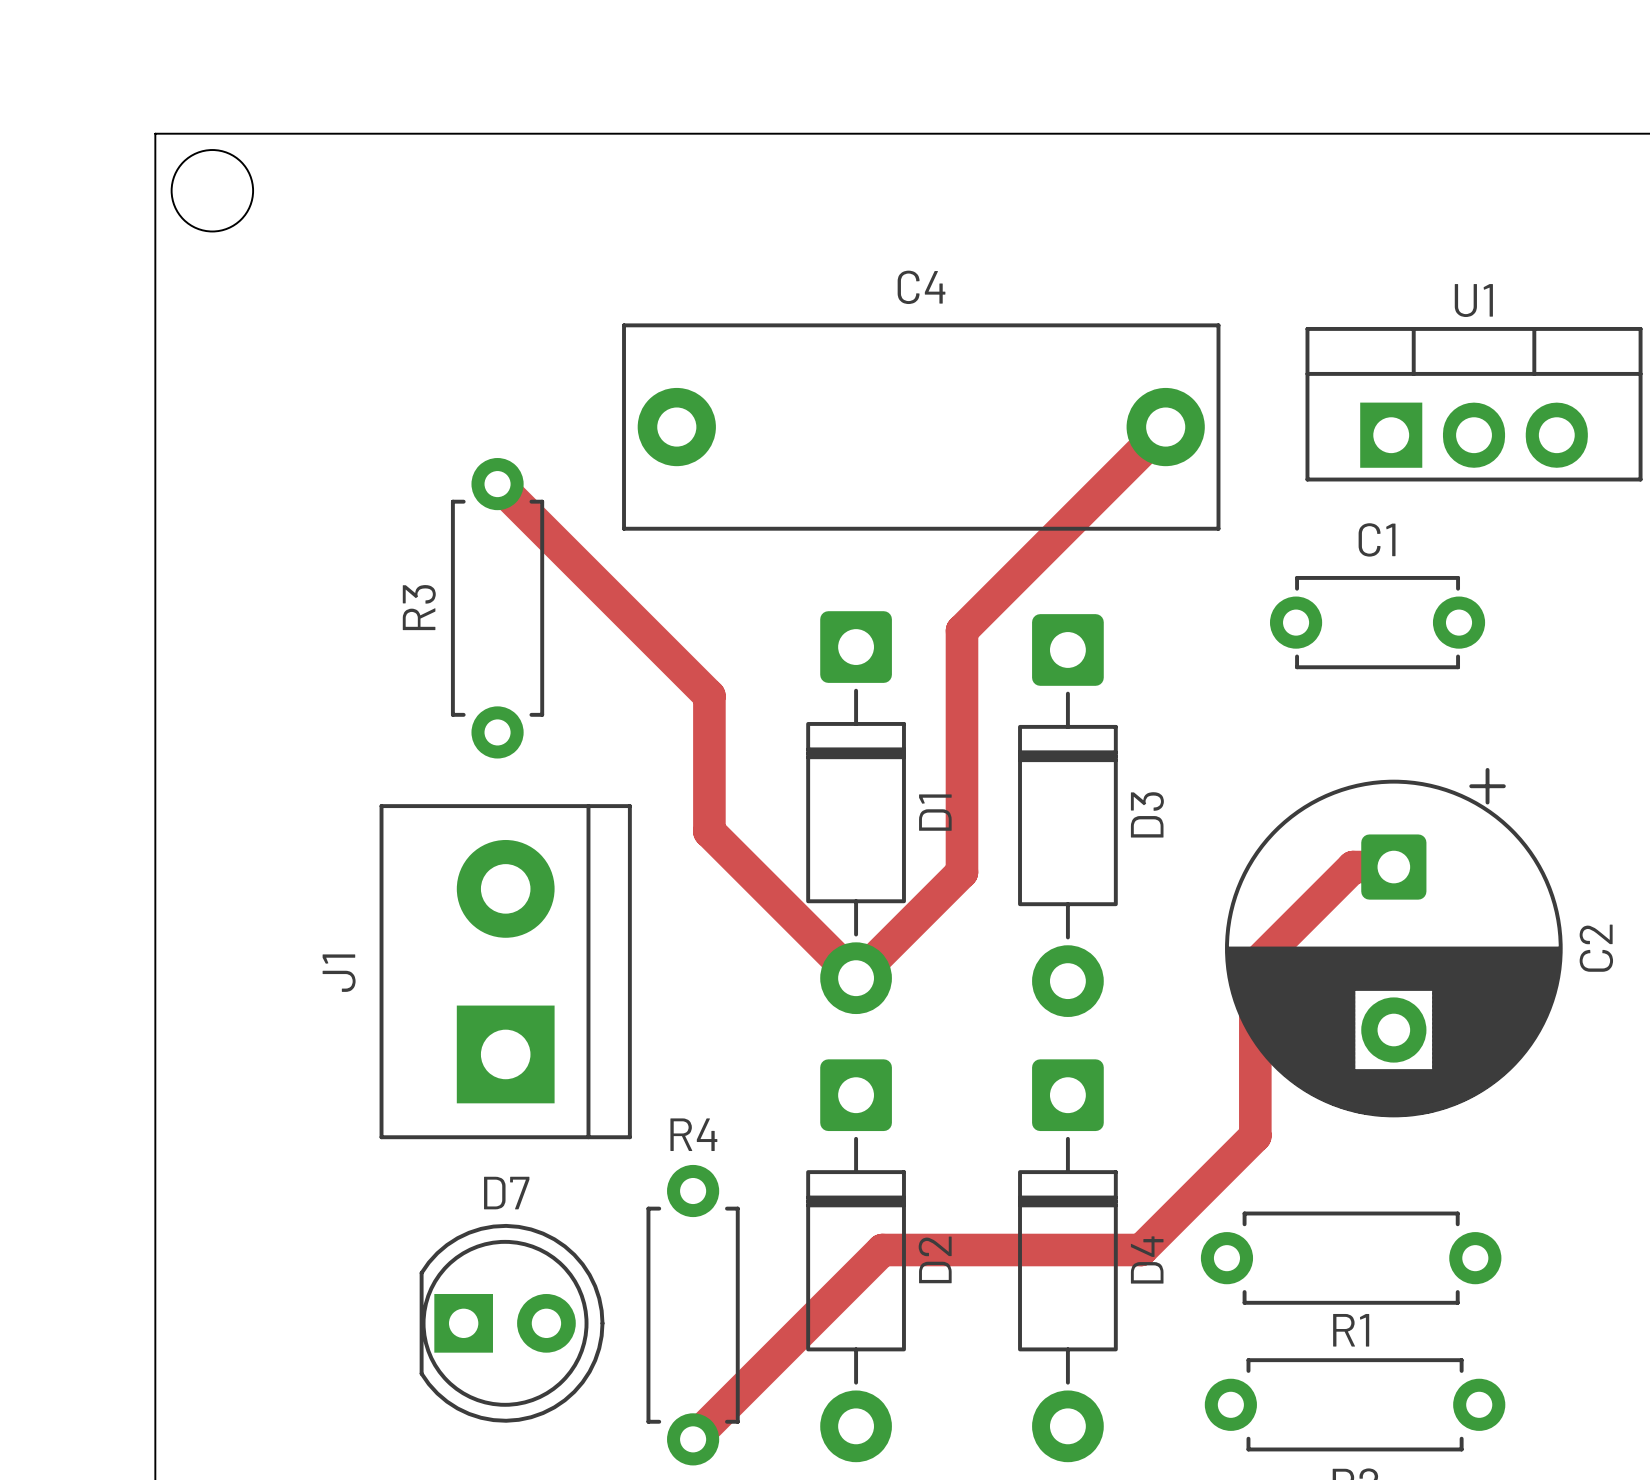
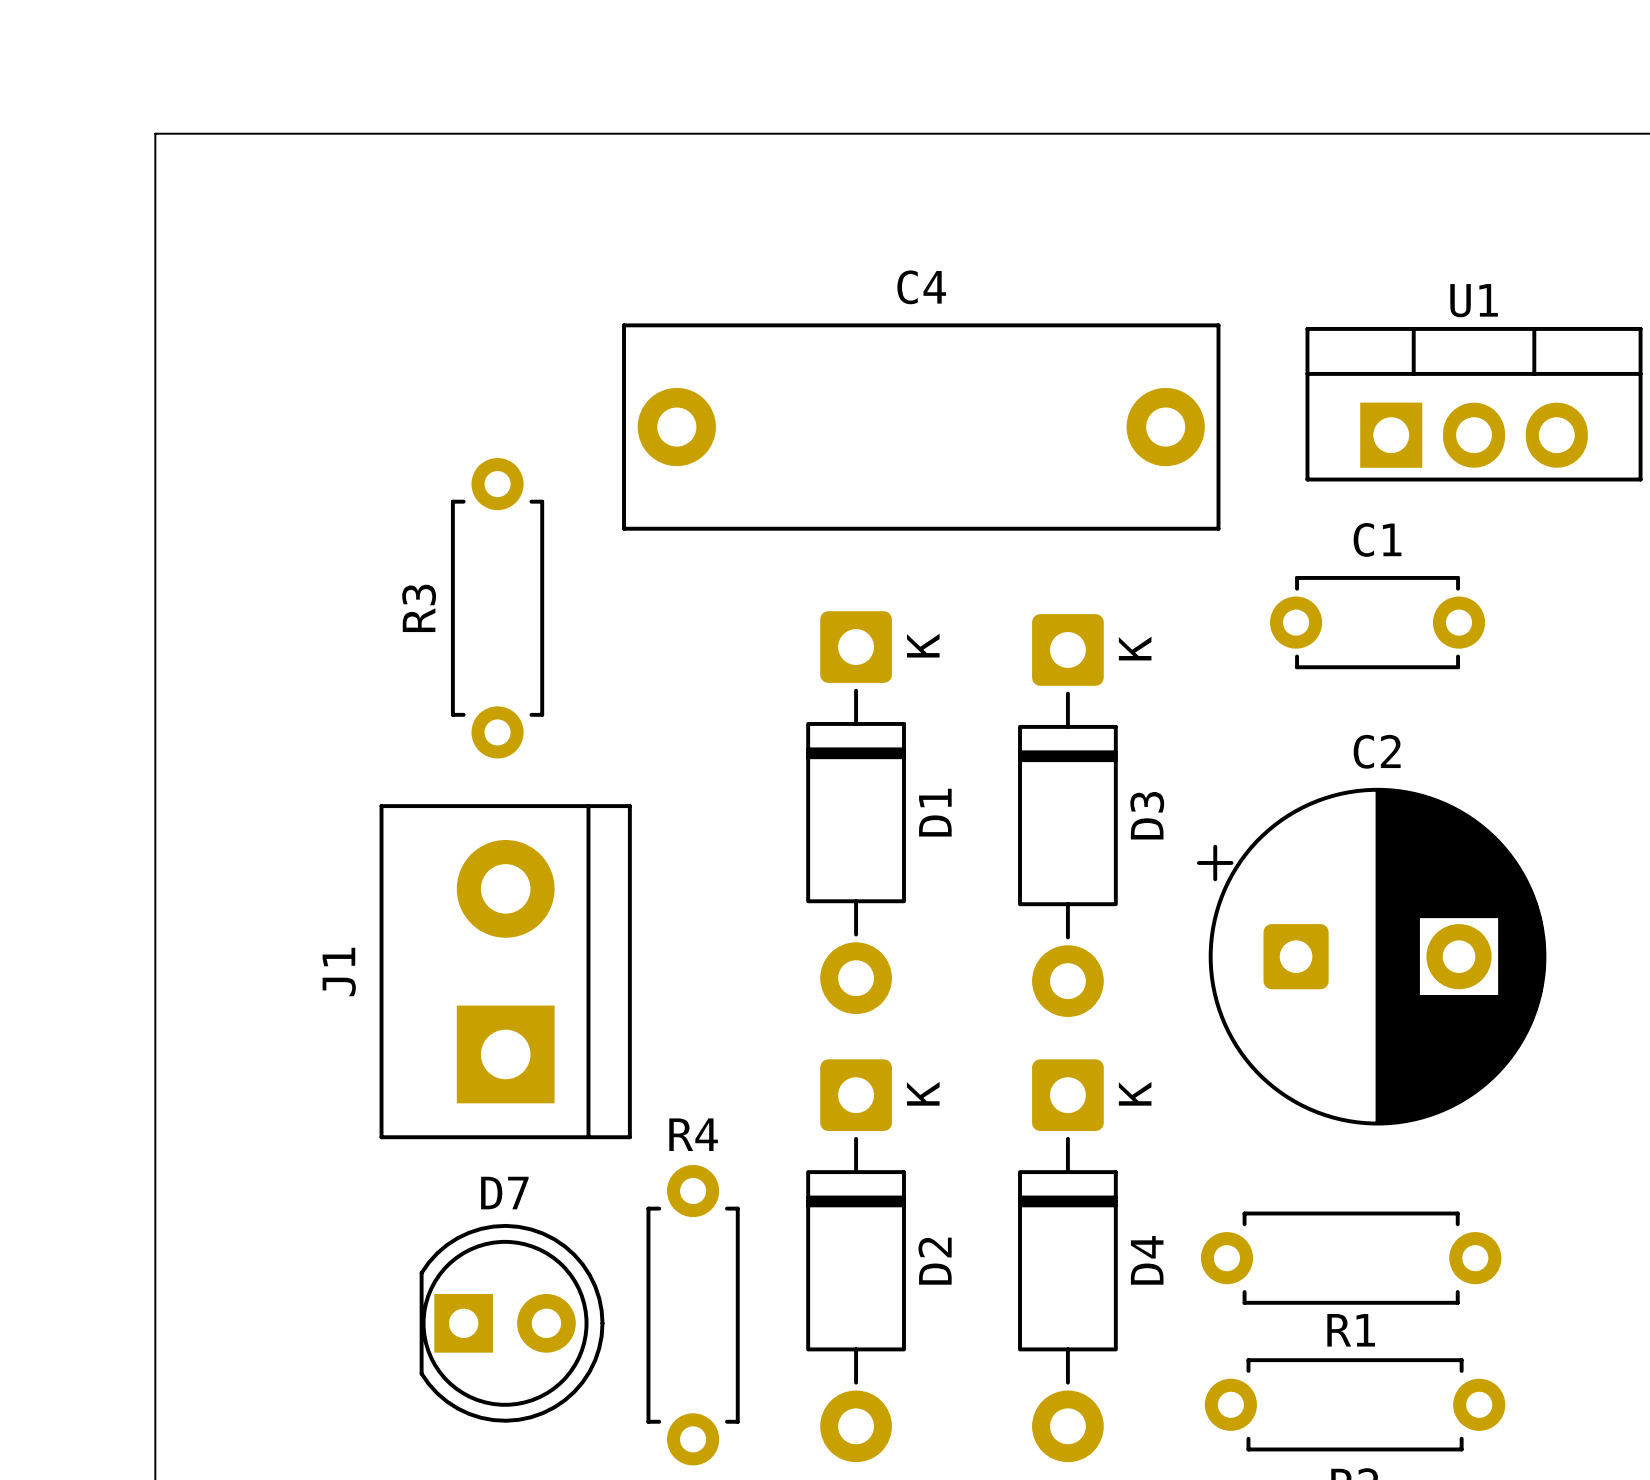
round board edge: [170, 149, 254, 233] -> none
track: (1165, 427) (961, 630) (961, 872) (856, 978) (709, 831) (709, 695) (497, 484) -> none
D1 text: none -> K (923, 645)
D3 text: none -> K (1135, 648)
track: (1393, 867) (1353, 867) (1255, 964) (1255, 1135) (1141, 1250) (882, 1250) (693, 1439) -> none
C2 rotation: 0° (1393, 942) -> 90° counterclockwise (1371, 956)
D2 text: none -> K (923, 1093)
D4 text: none -> K (1135, 1093)

